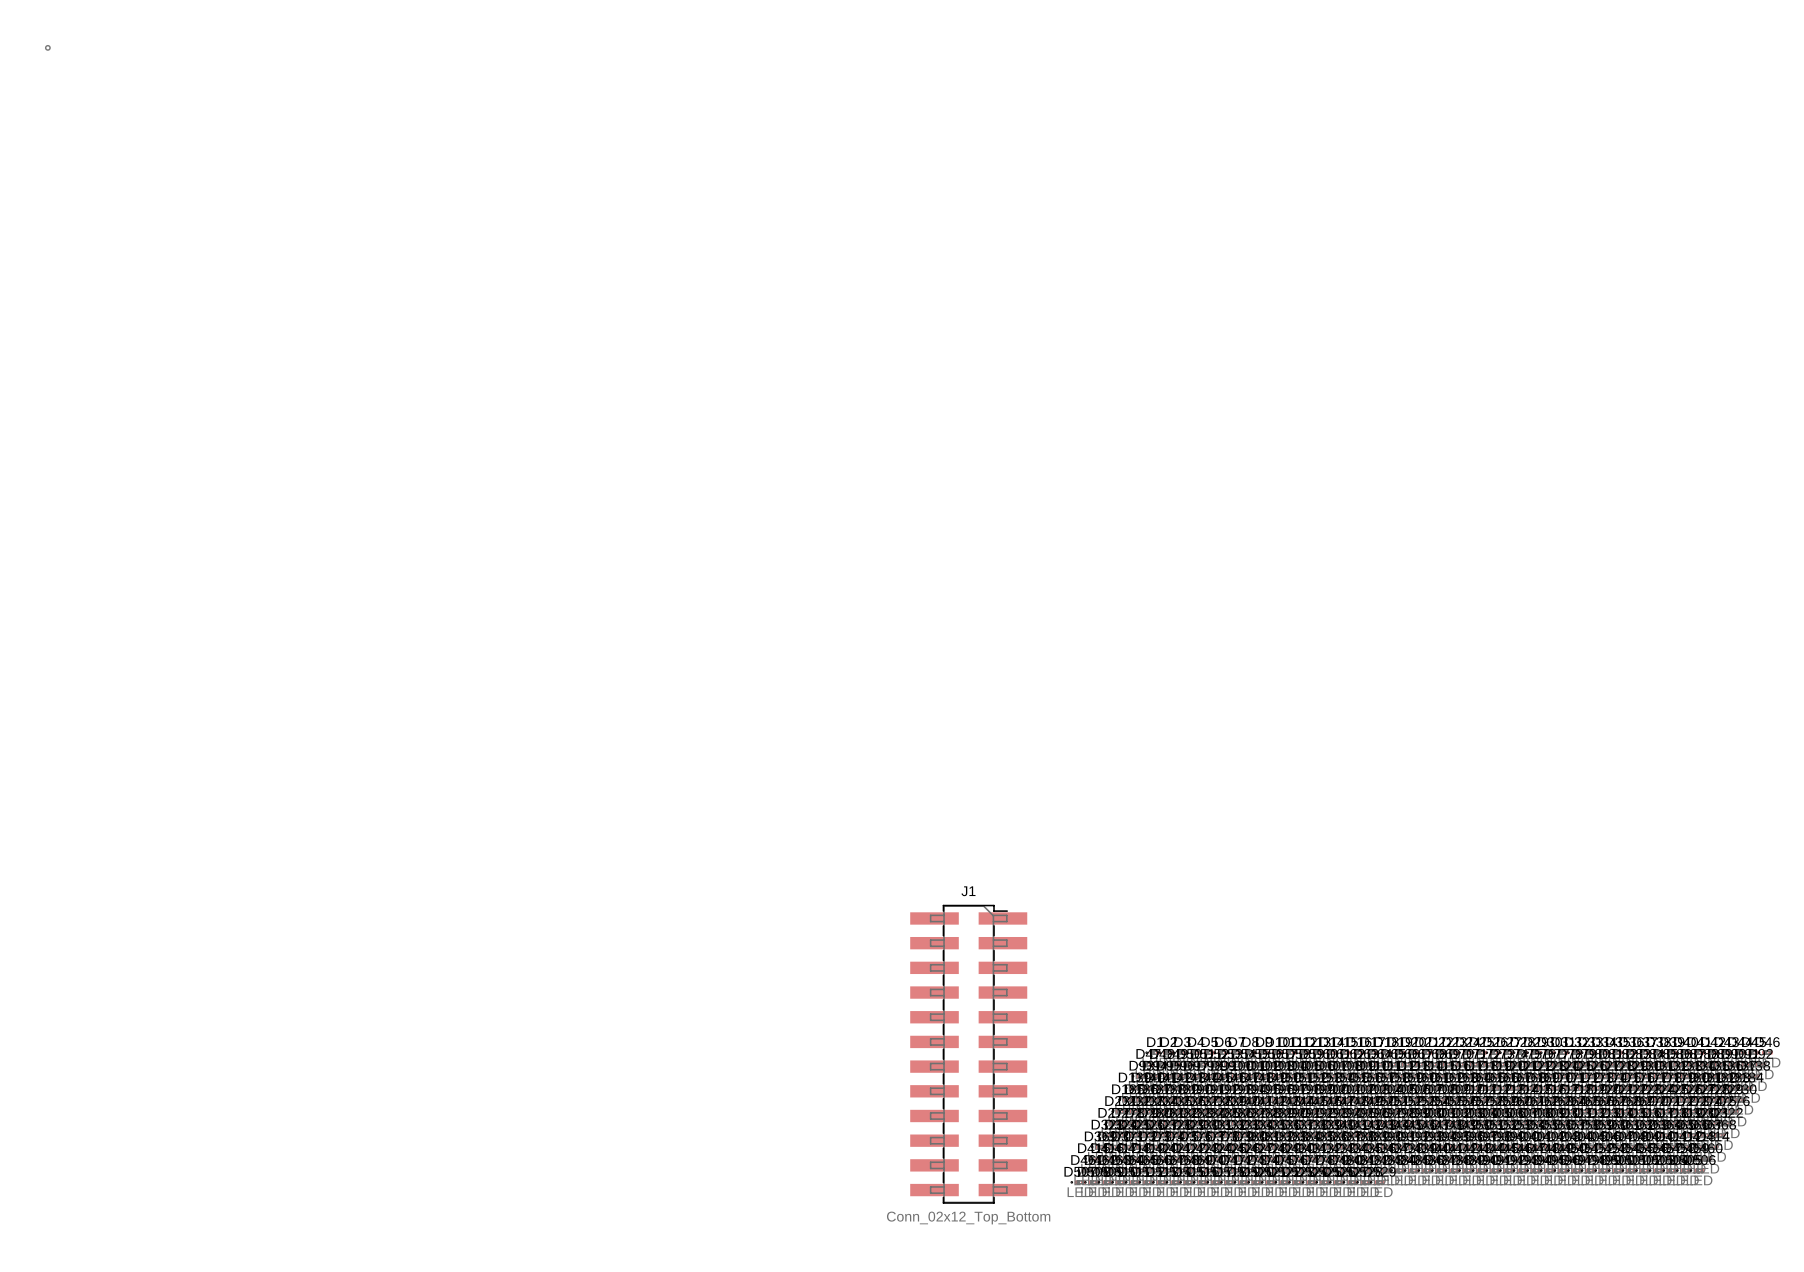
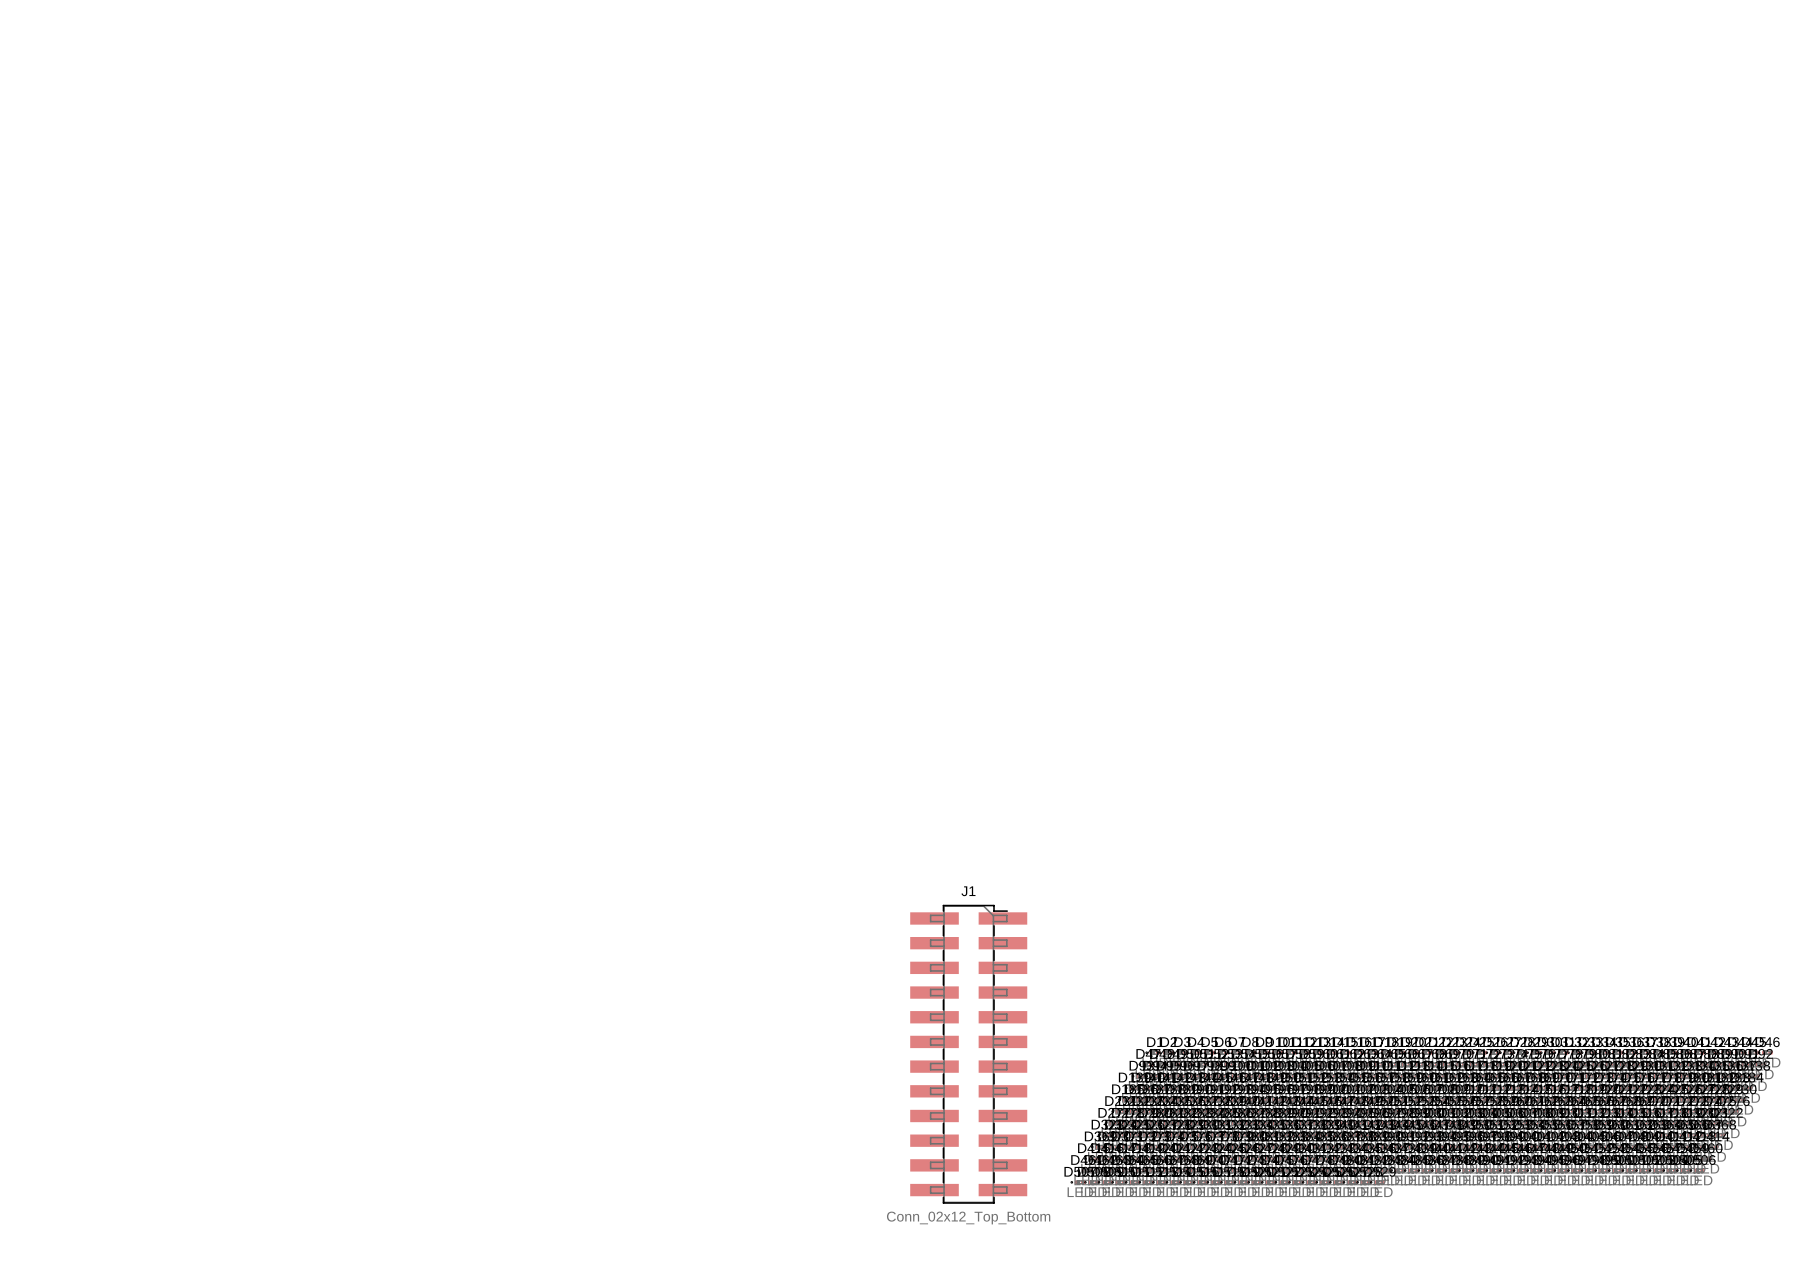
via: (47, 47) -> none

